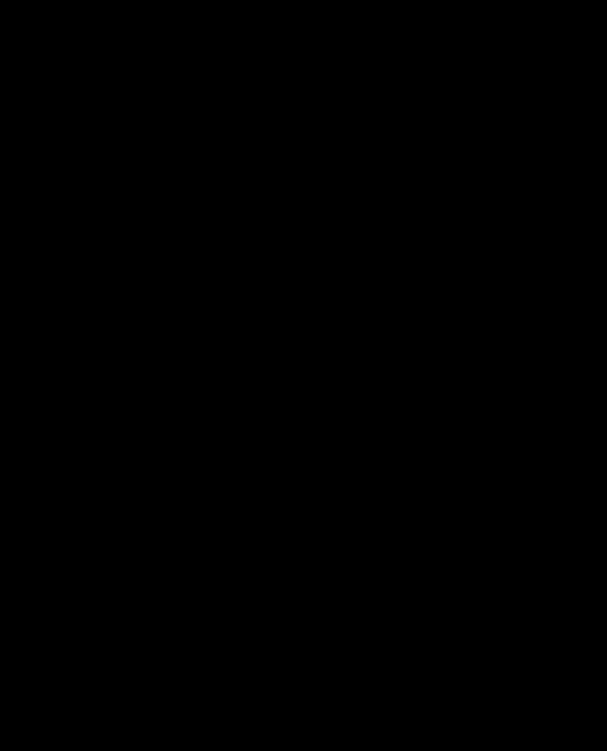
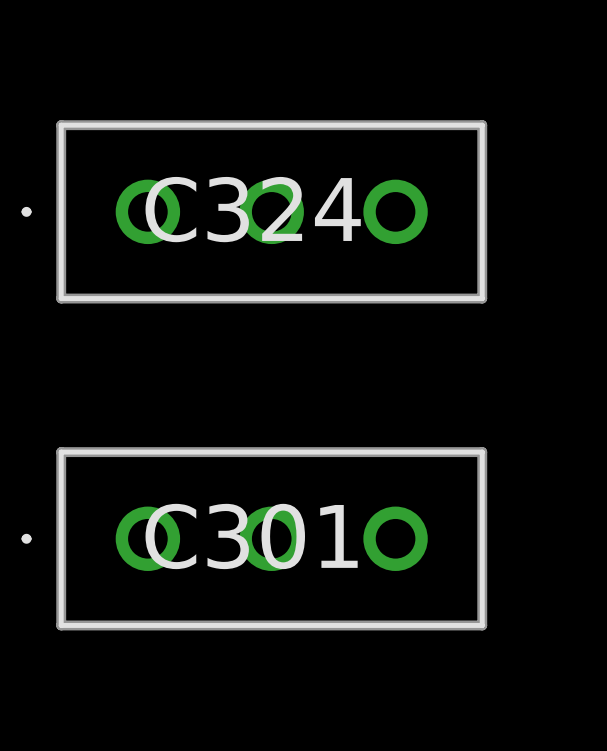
C324: none -> (254, 211)
C301: none -> (254, 538)

